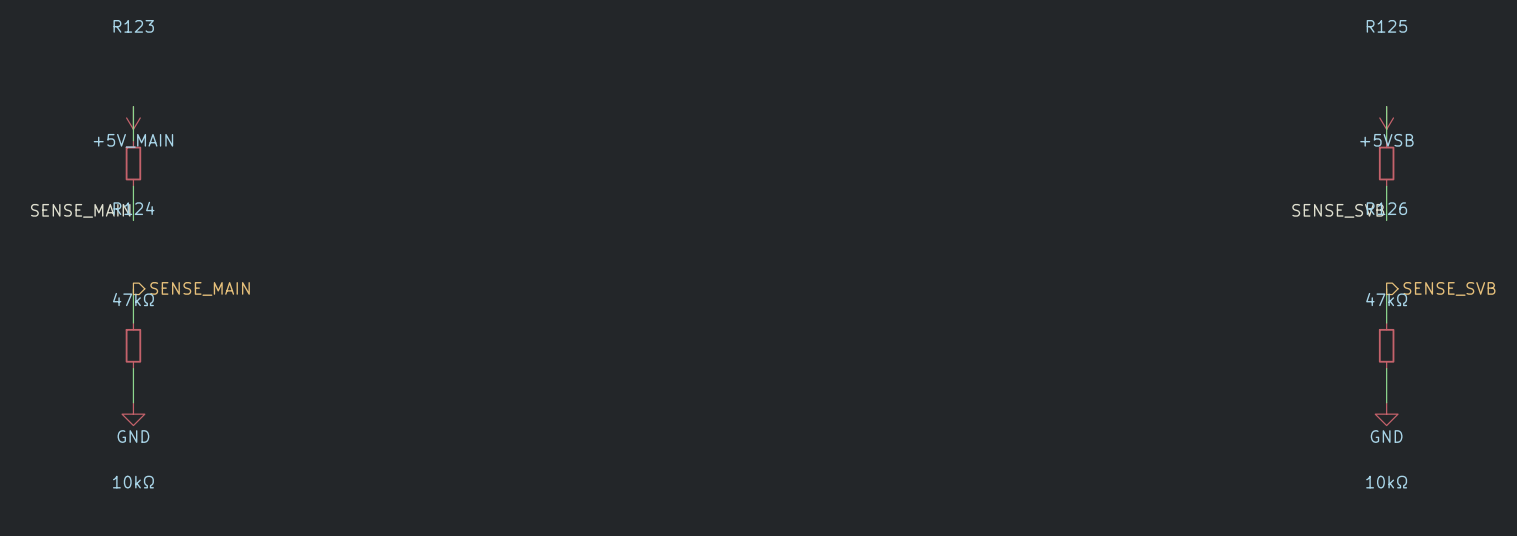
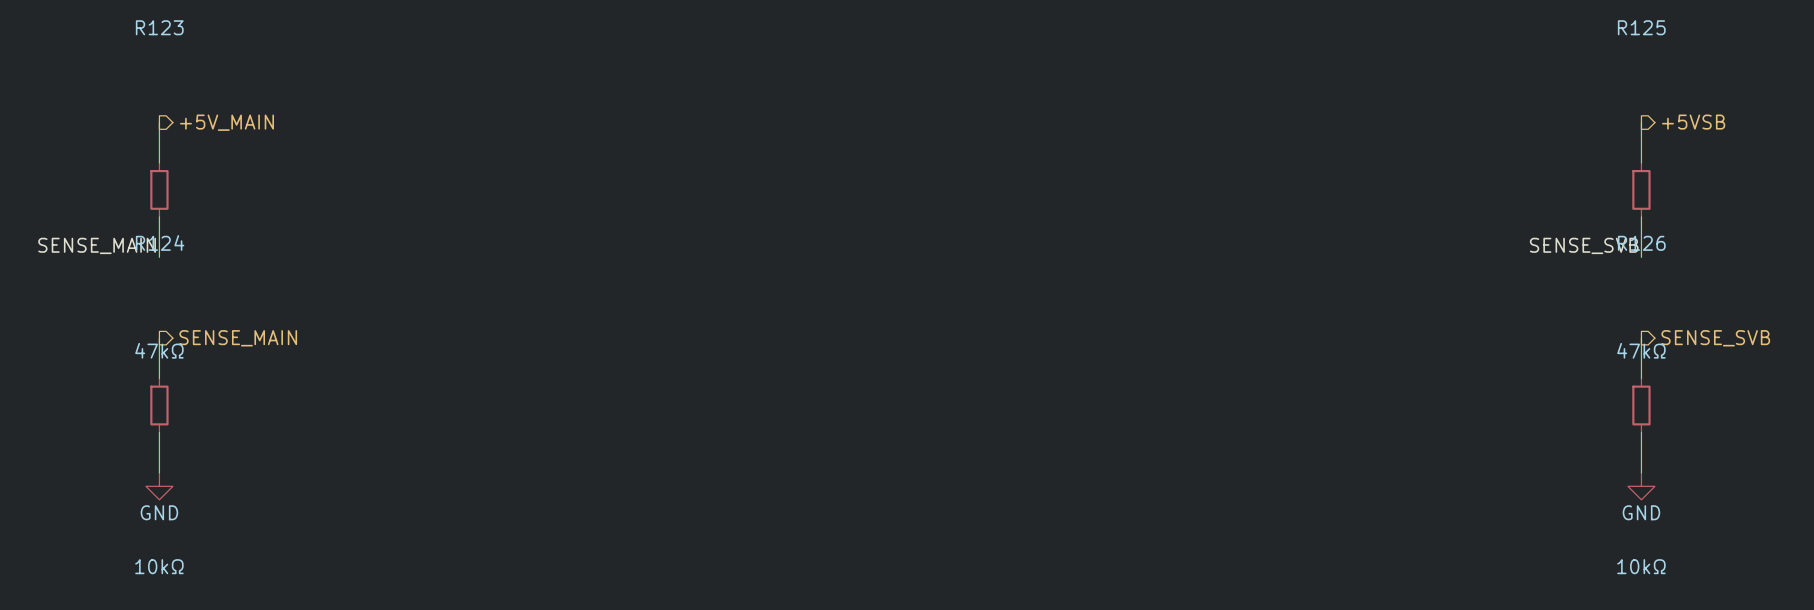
hierarchical label: none -> +5V_MAIN (227, 122)
hierarchical label: none -> +5VSB (1693, 122)
power symbol: +5V_MAIN (133, 117) -> none
power symbol: +5VSB (1386, 117) -> none

